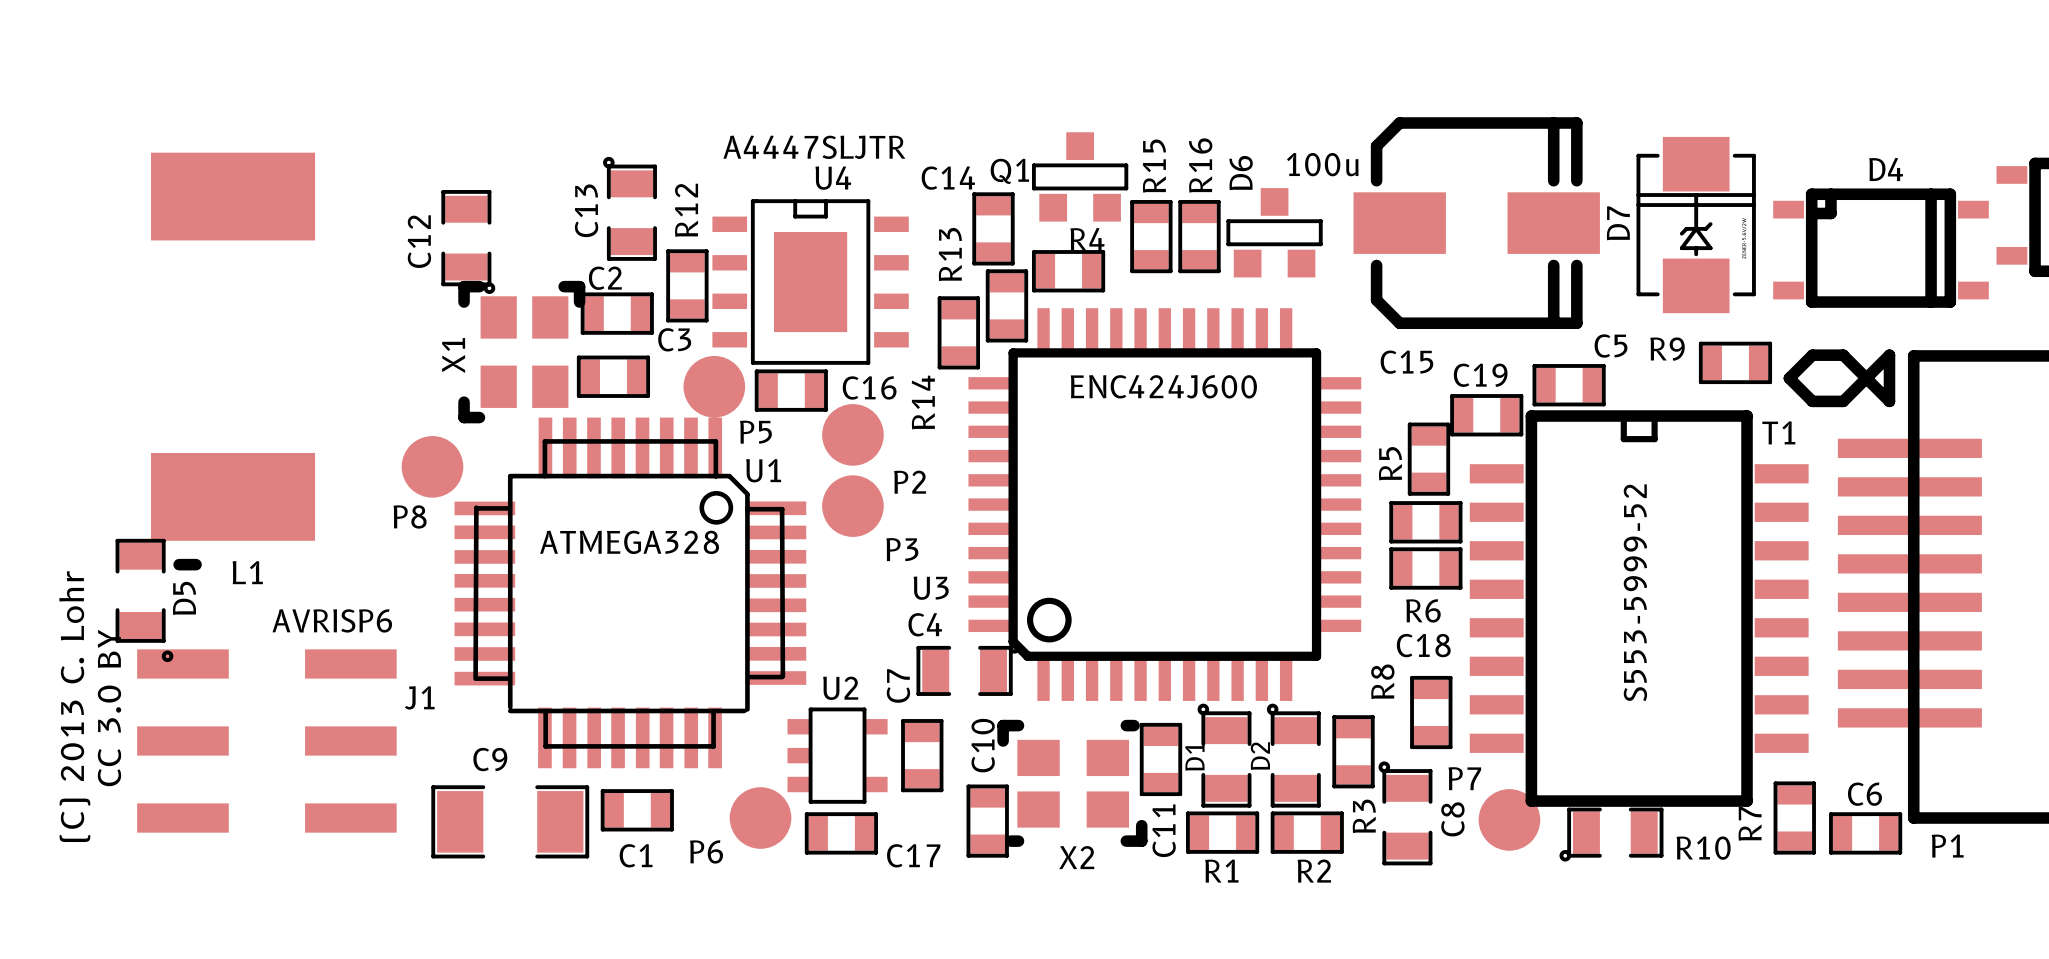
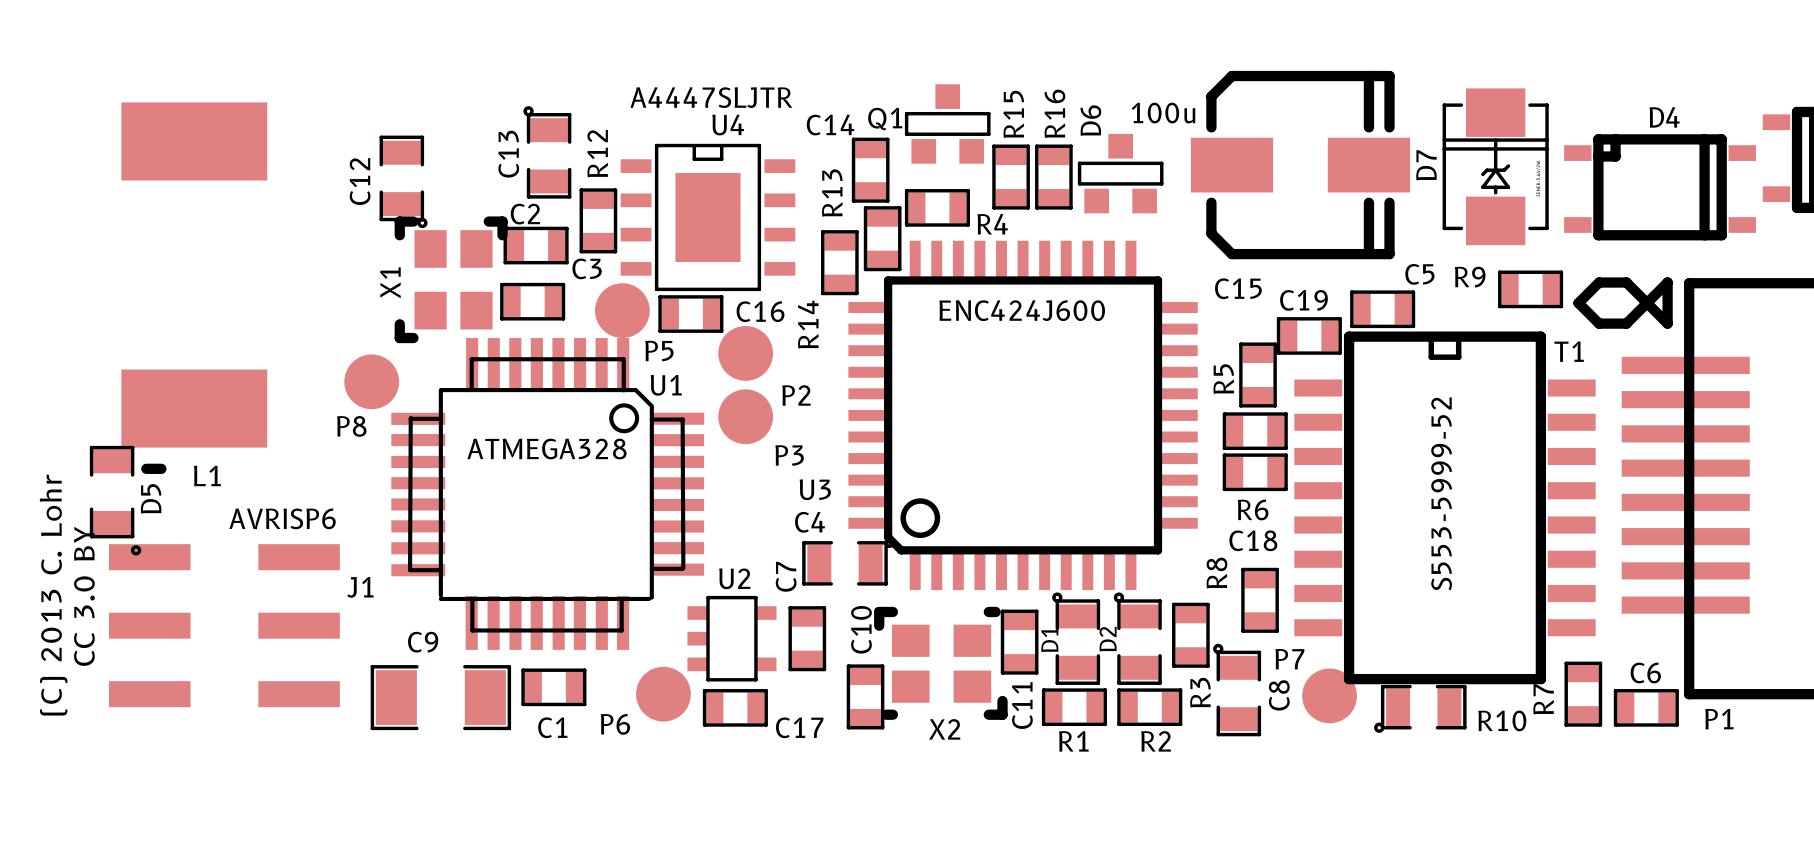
R4 name position: R4 (1087, 239) -> R4 (992, 224)

